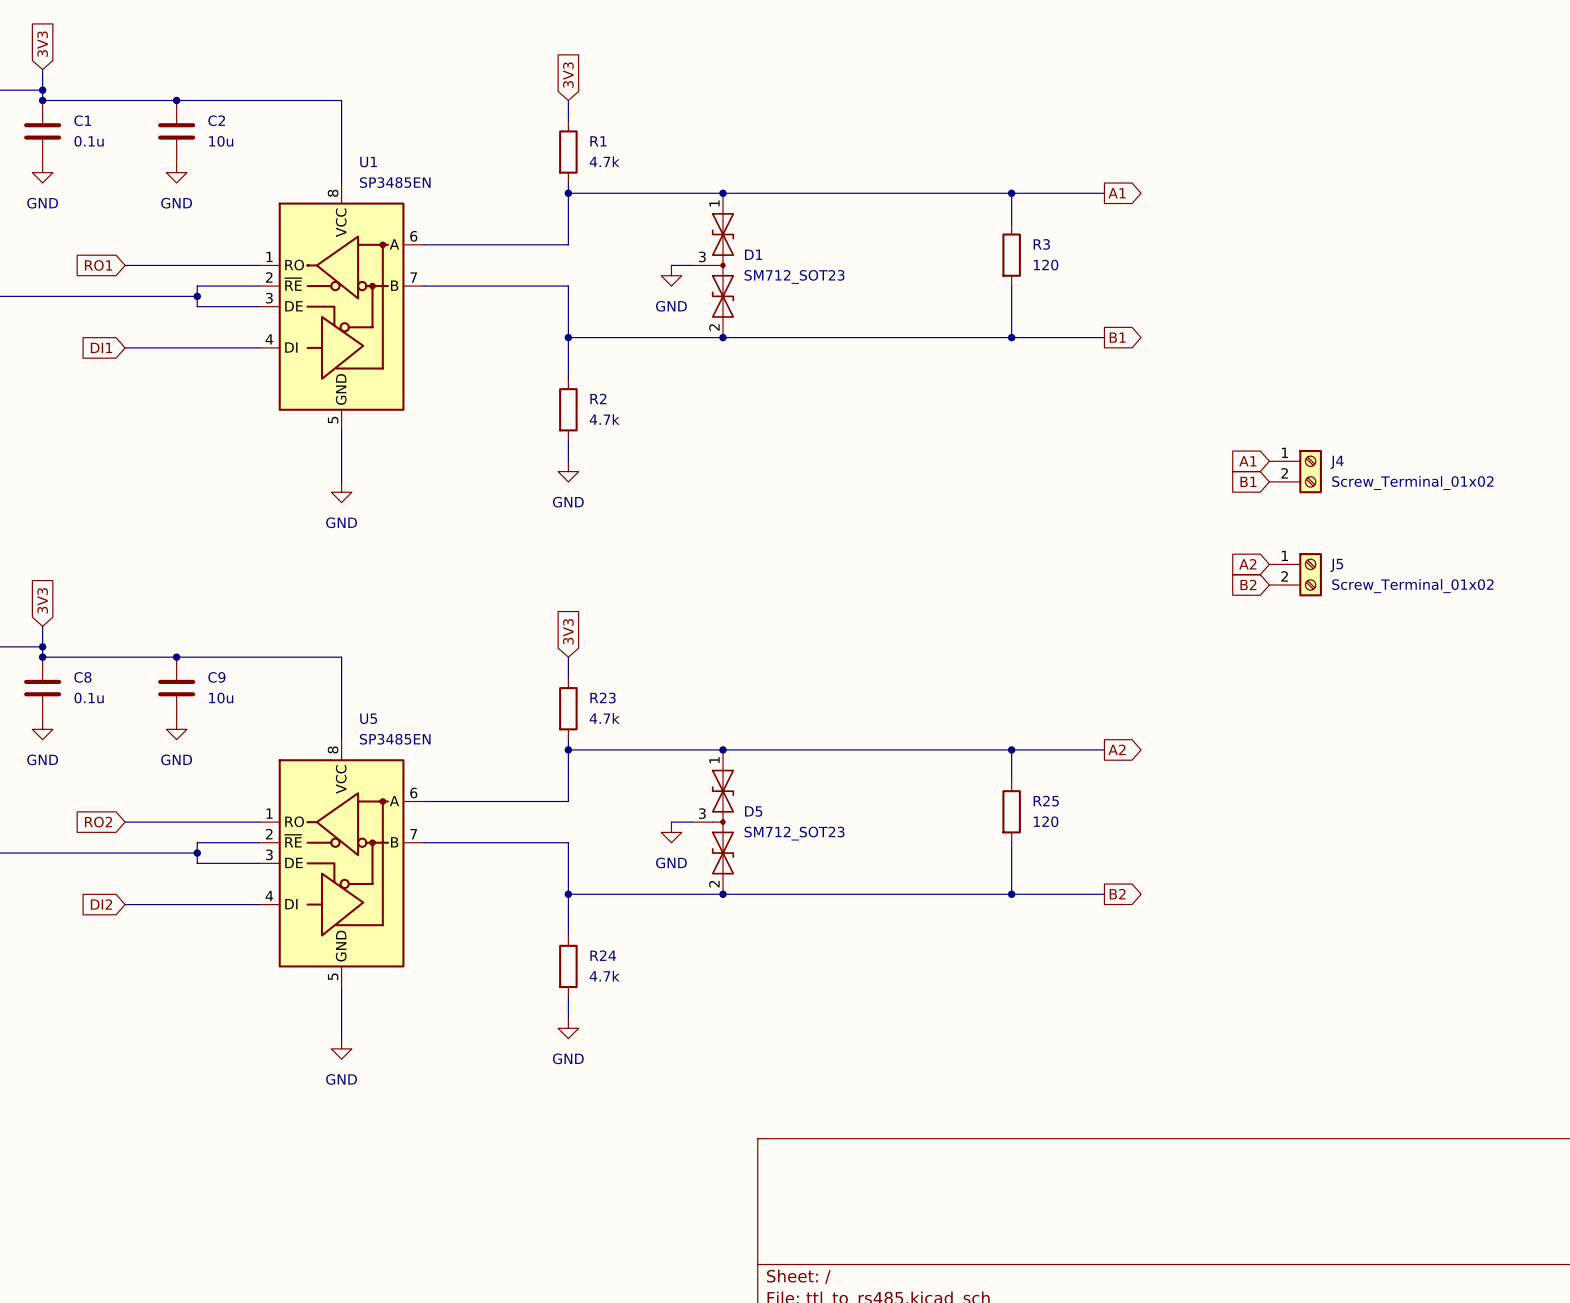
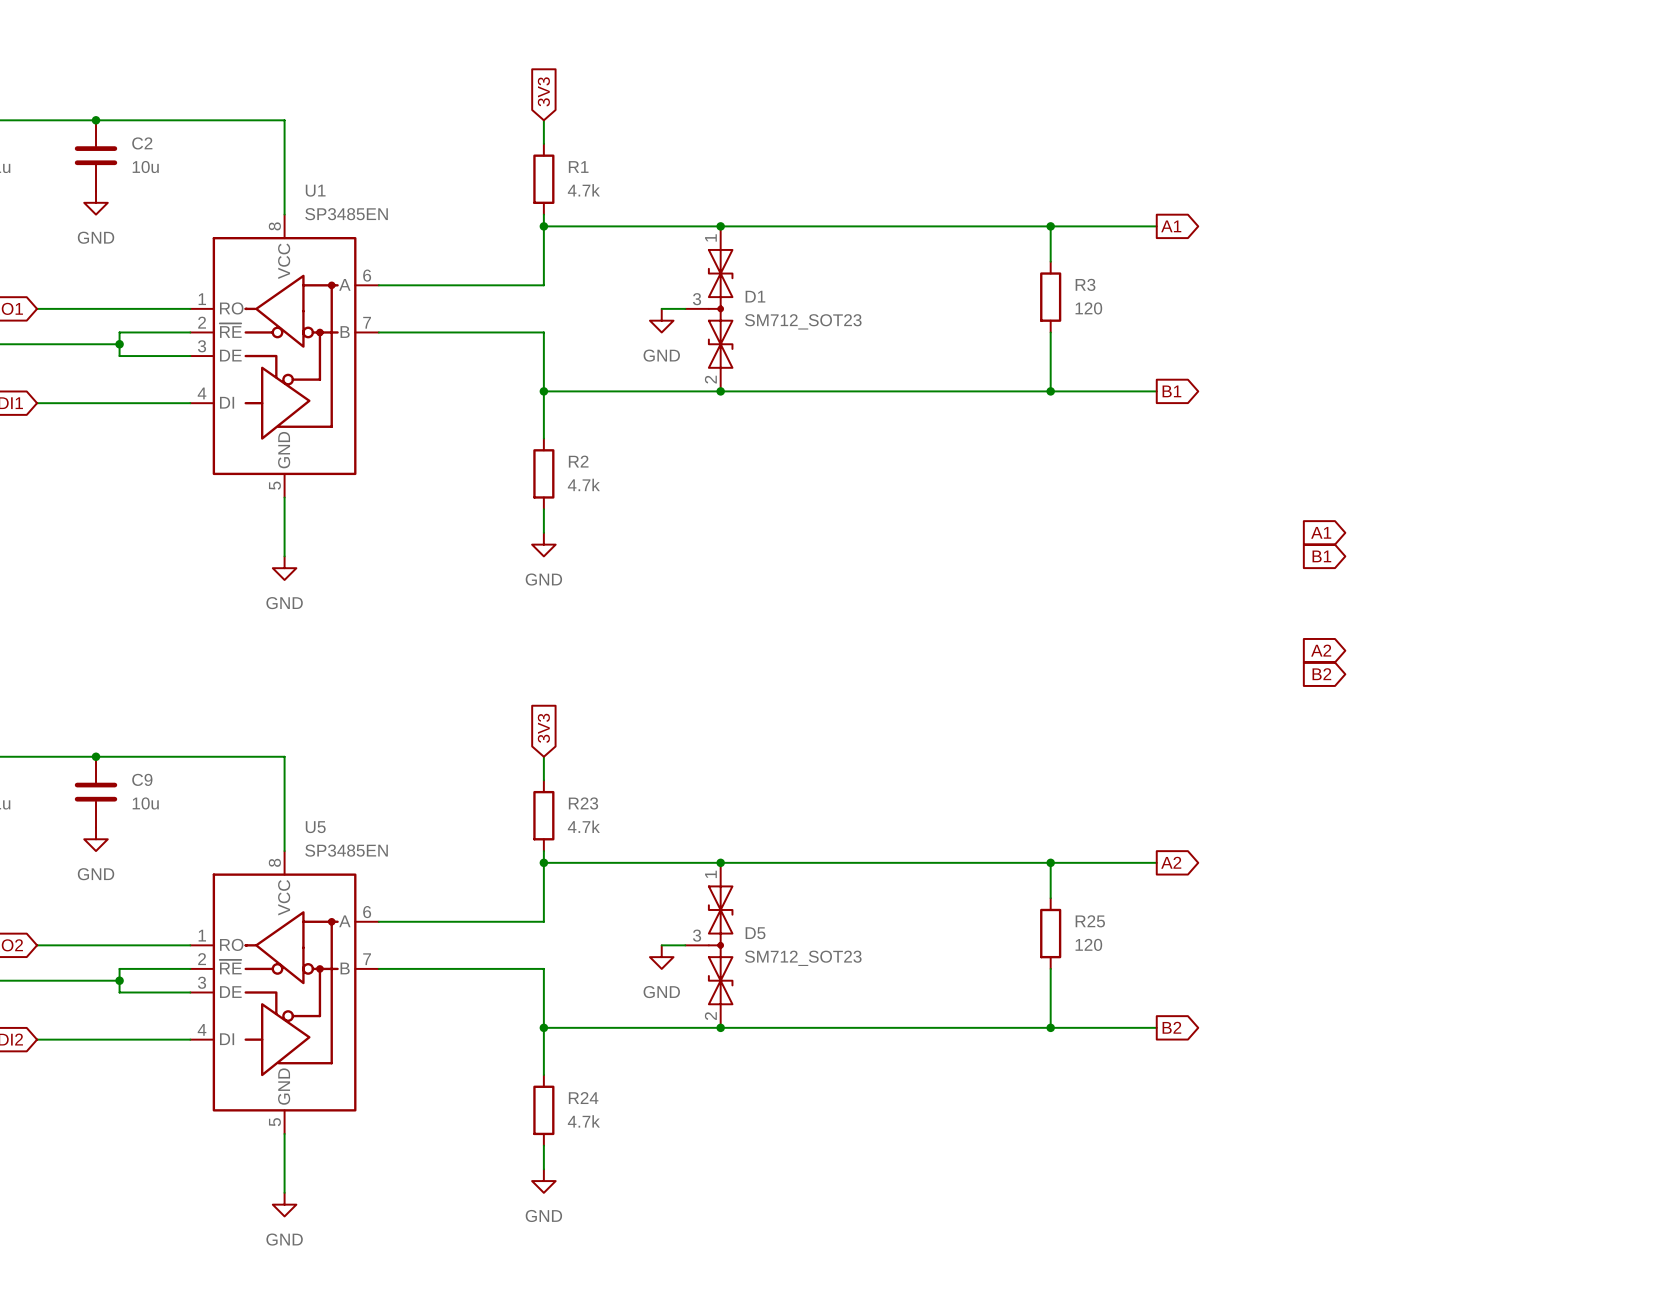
J4: Screw_Terminal_01x02 (1295, 471) -> none
J5: Screw_Terminal_01x02 (1295, 574) -> none

